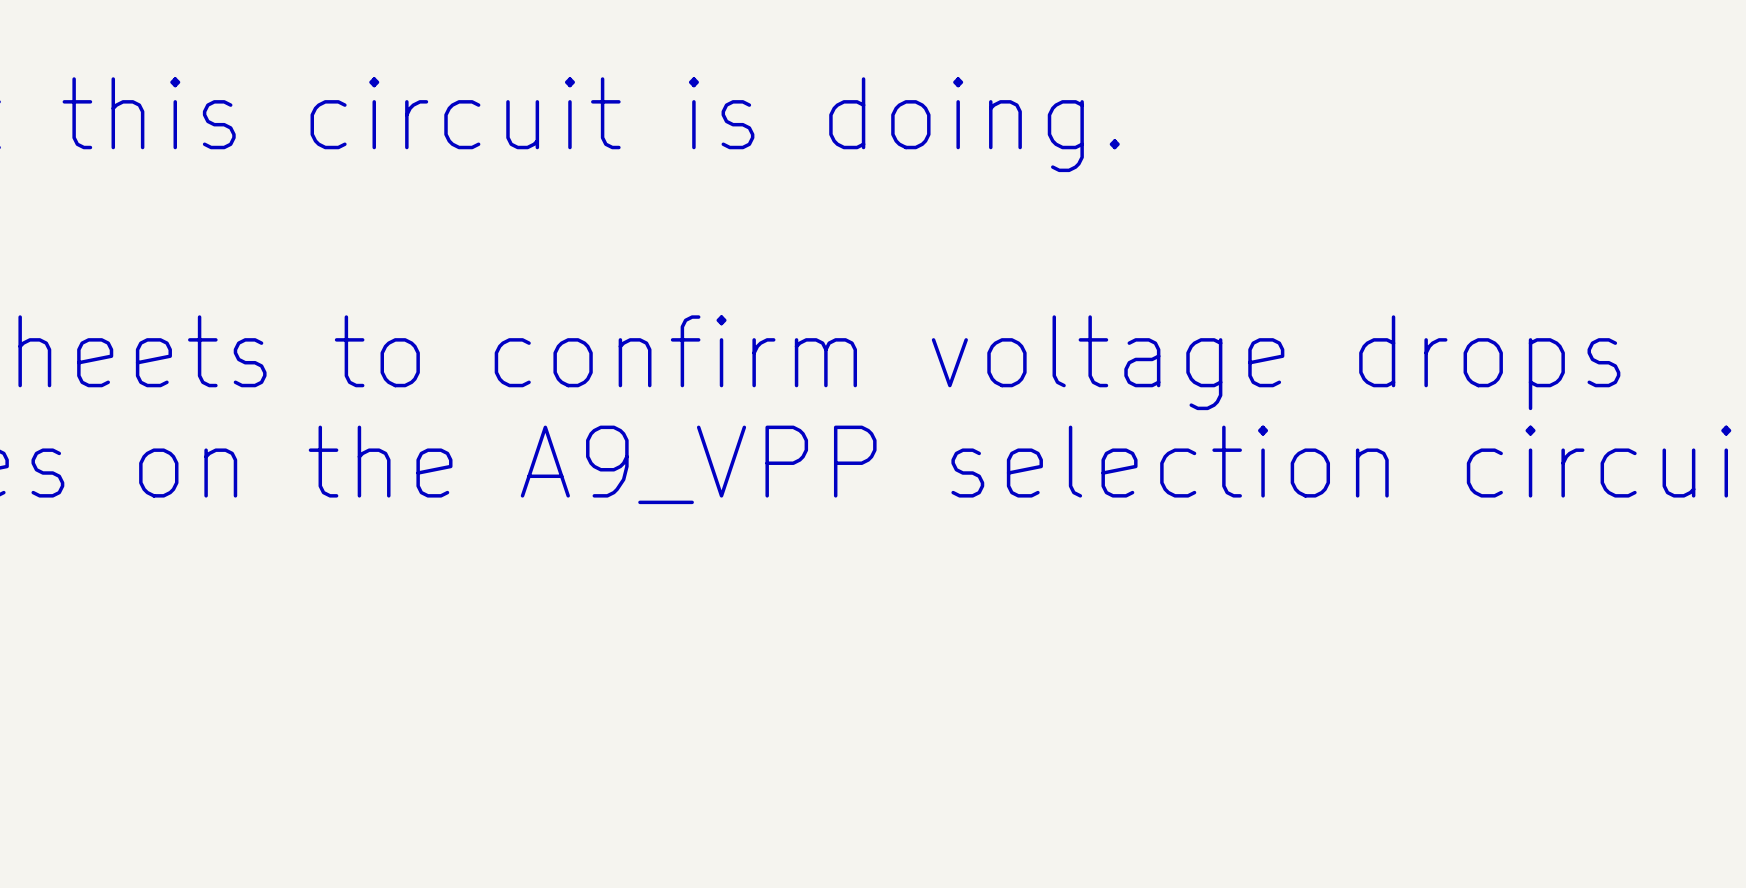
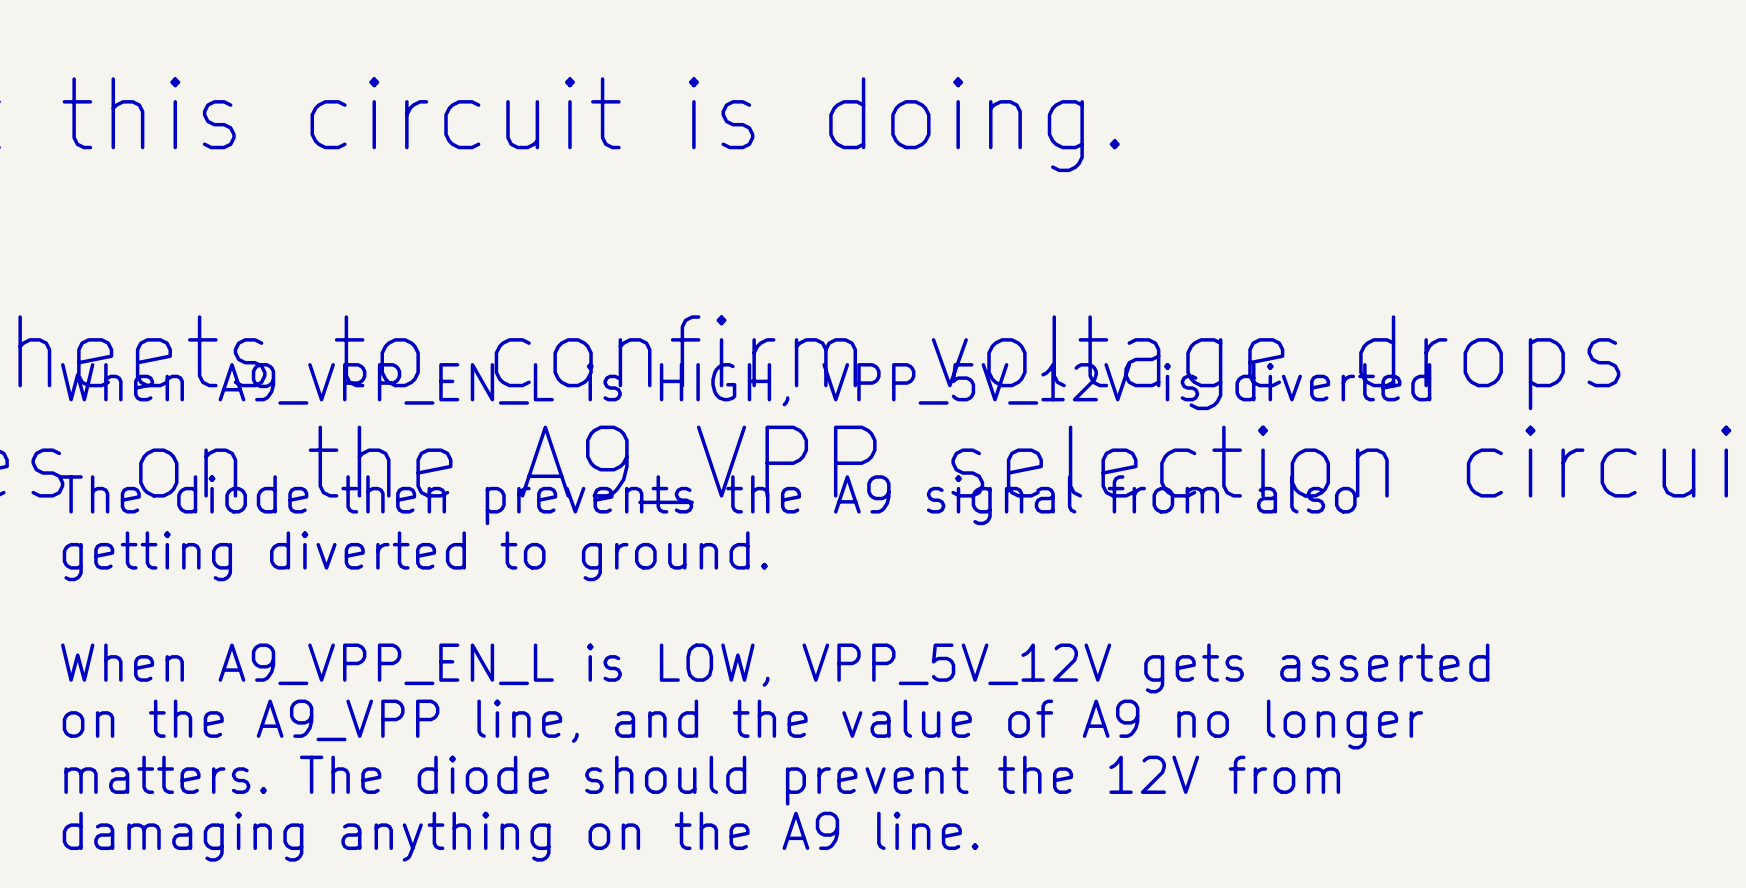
text: none -> When A9_VPP_EN_L is HIGH, VPP_5V_12V is diverted (746, 384)
text: none -> The diode then prevents the A9 signal from also (708, 500)
text: none -> getting diverted to ground. (415, 556)
text: none -> When A9_VPP_EN_L is LOW, VPP_5V_12V gets asserted (775, 668)
text: none -> on the A9_VPP line, and the value of A9 no longer (742, 724)
text: none -> matters. The diode should prevent the 12V from (702, 780)
text: none -> damaging anything on the A9 line. (520, 836)

